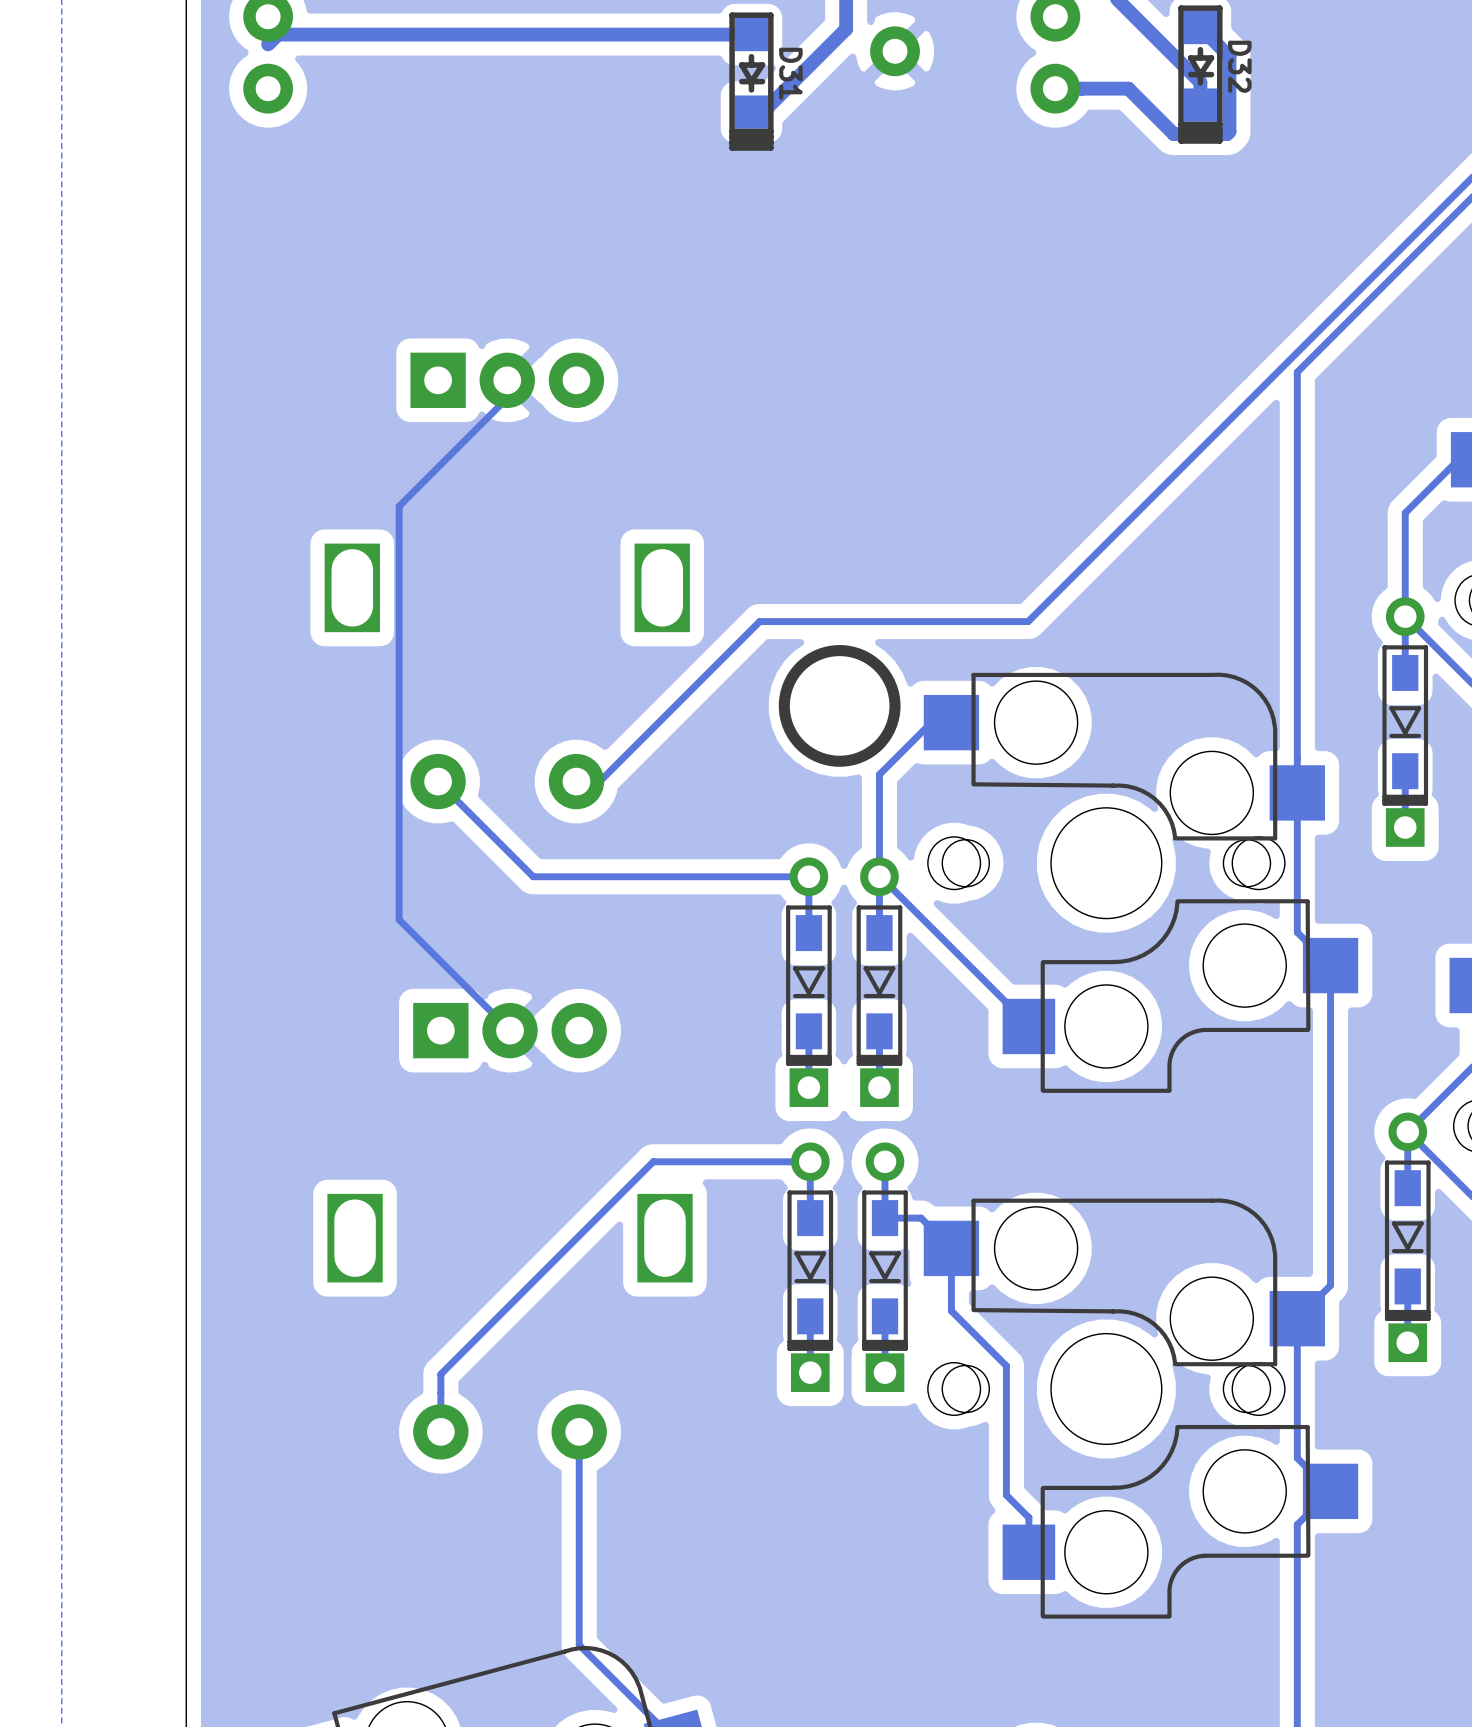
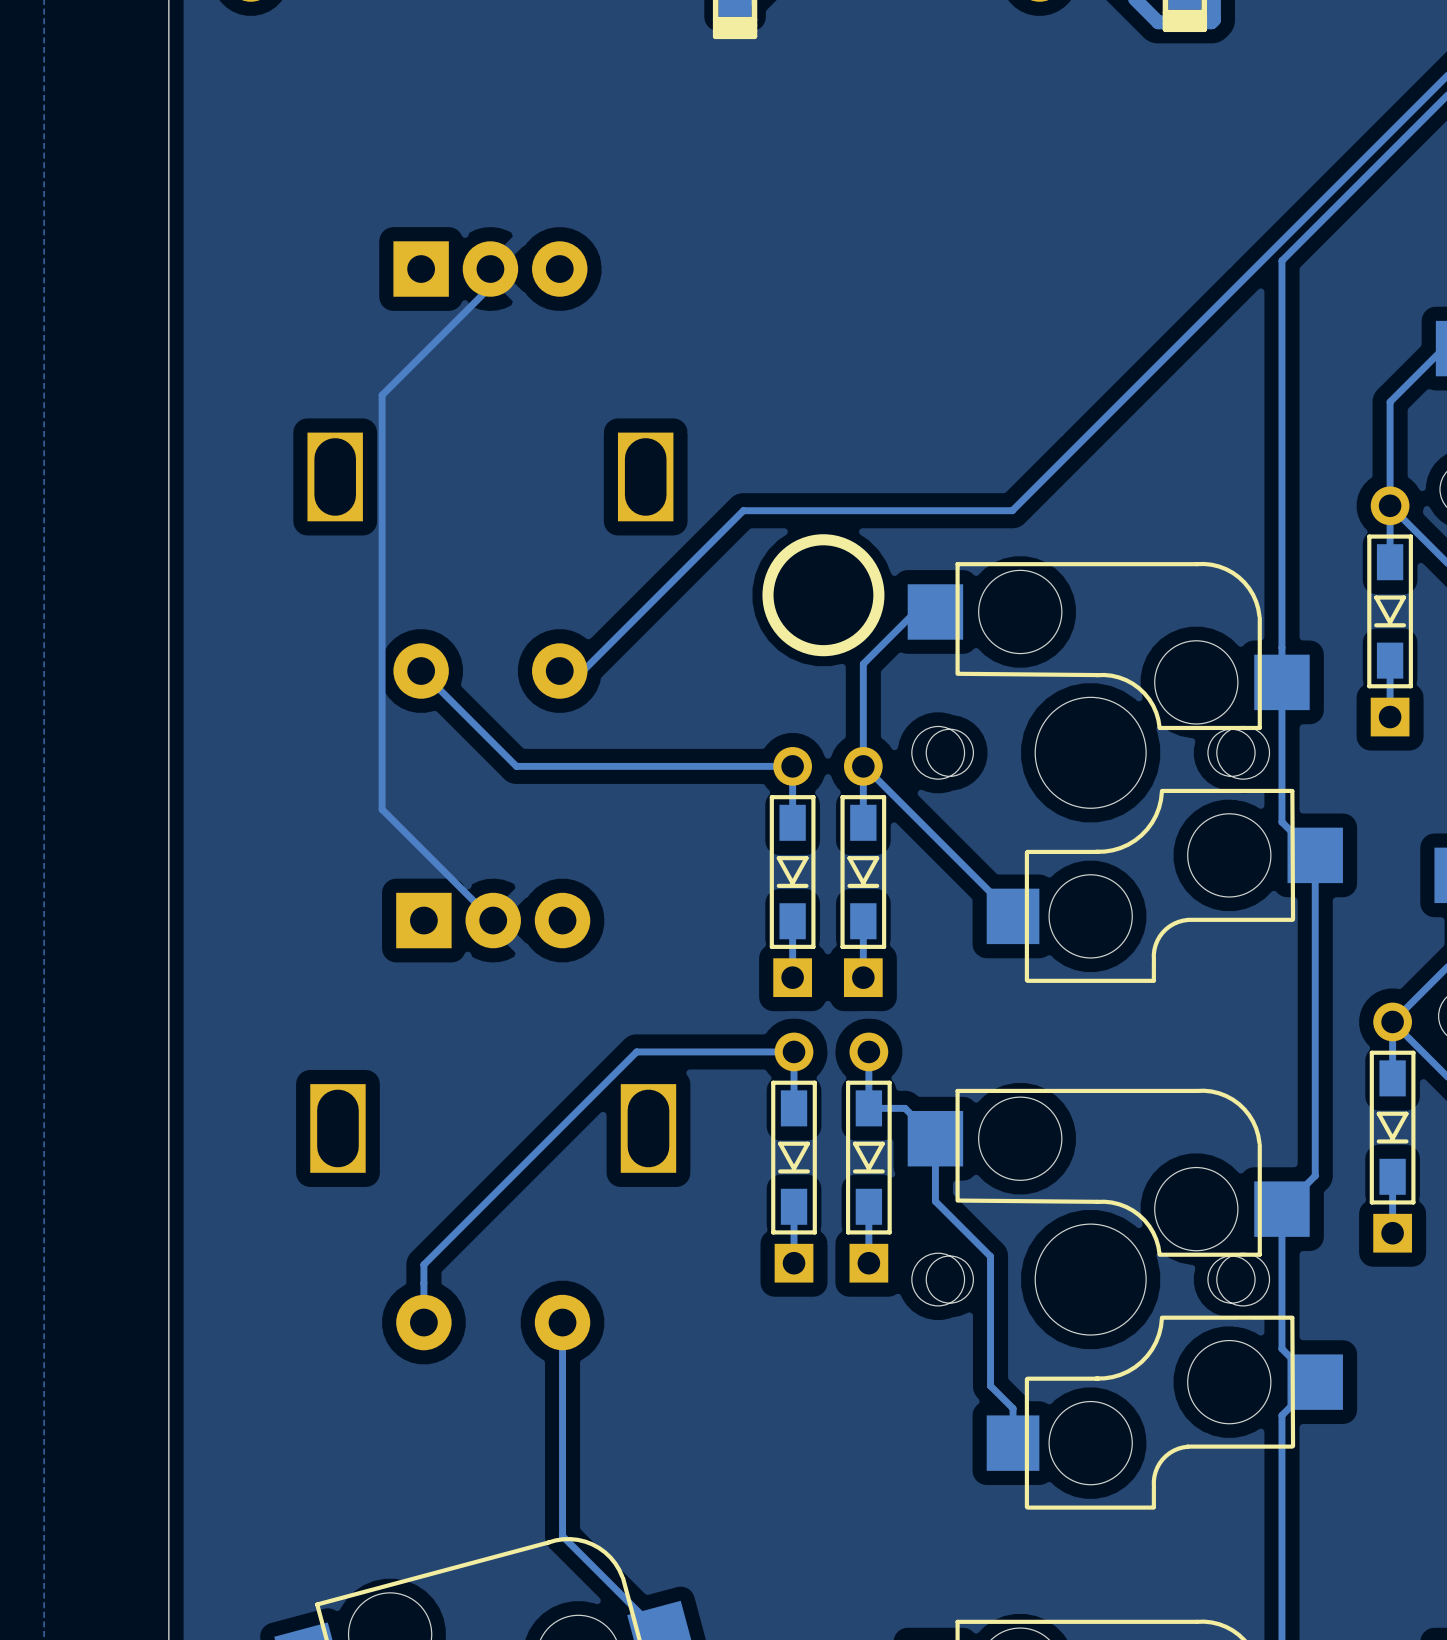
part footprint: [1382, 597, 1429, 847] -> [1367, 486, 1413, 737]
part footprint: [786, 857, 832, 1107] -> [769, 747, 816, 998]
part footprint: [856, 857, 903, 1107] -> [840, 747, 887, 998]
part footprint: [1384, 1112, 1431, 1363] -> [1369, 1002, 1416, 1253]
part footprint: [787, 1142, 834, 1392] -> [771, 1032, 817, 1283]
part footprint: [862, 1142, 908, 1392] -> [846, 1032, 892, 1283]

